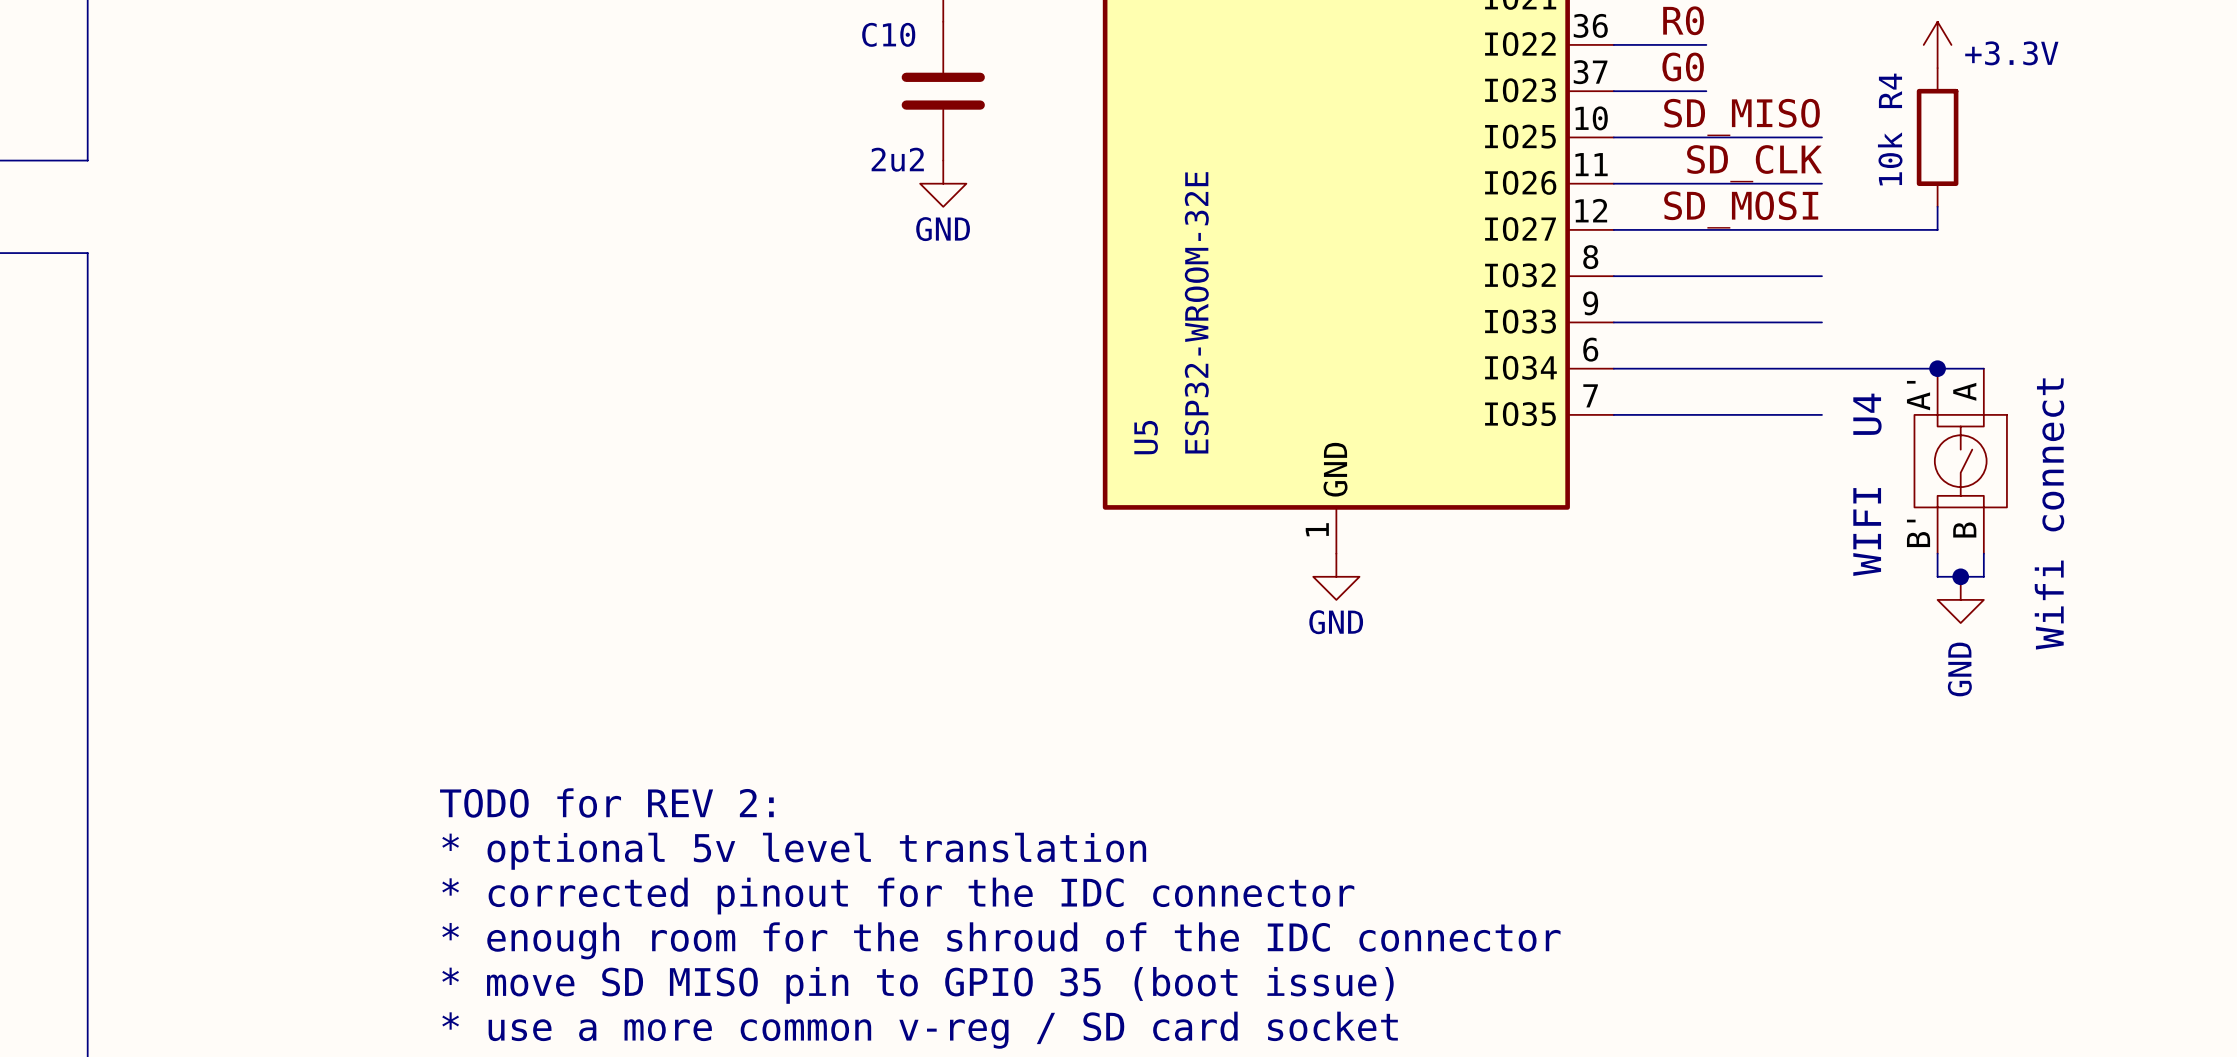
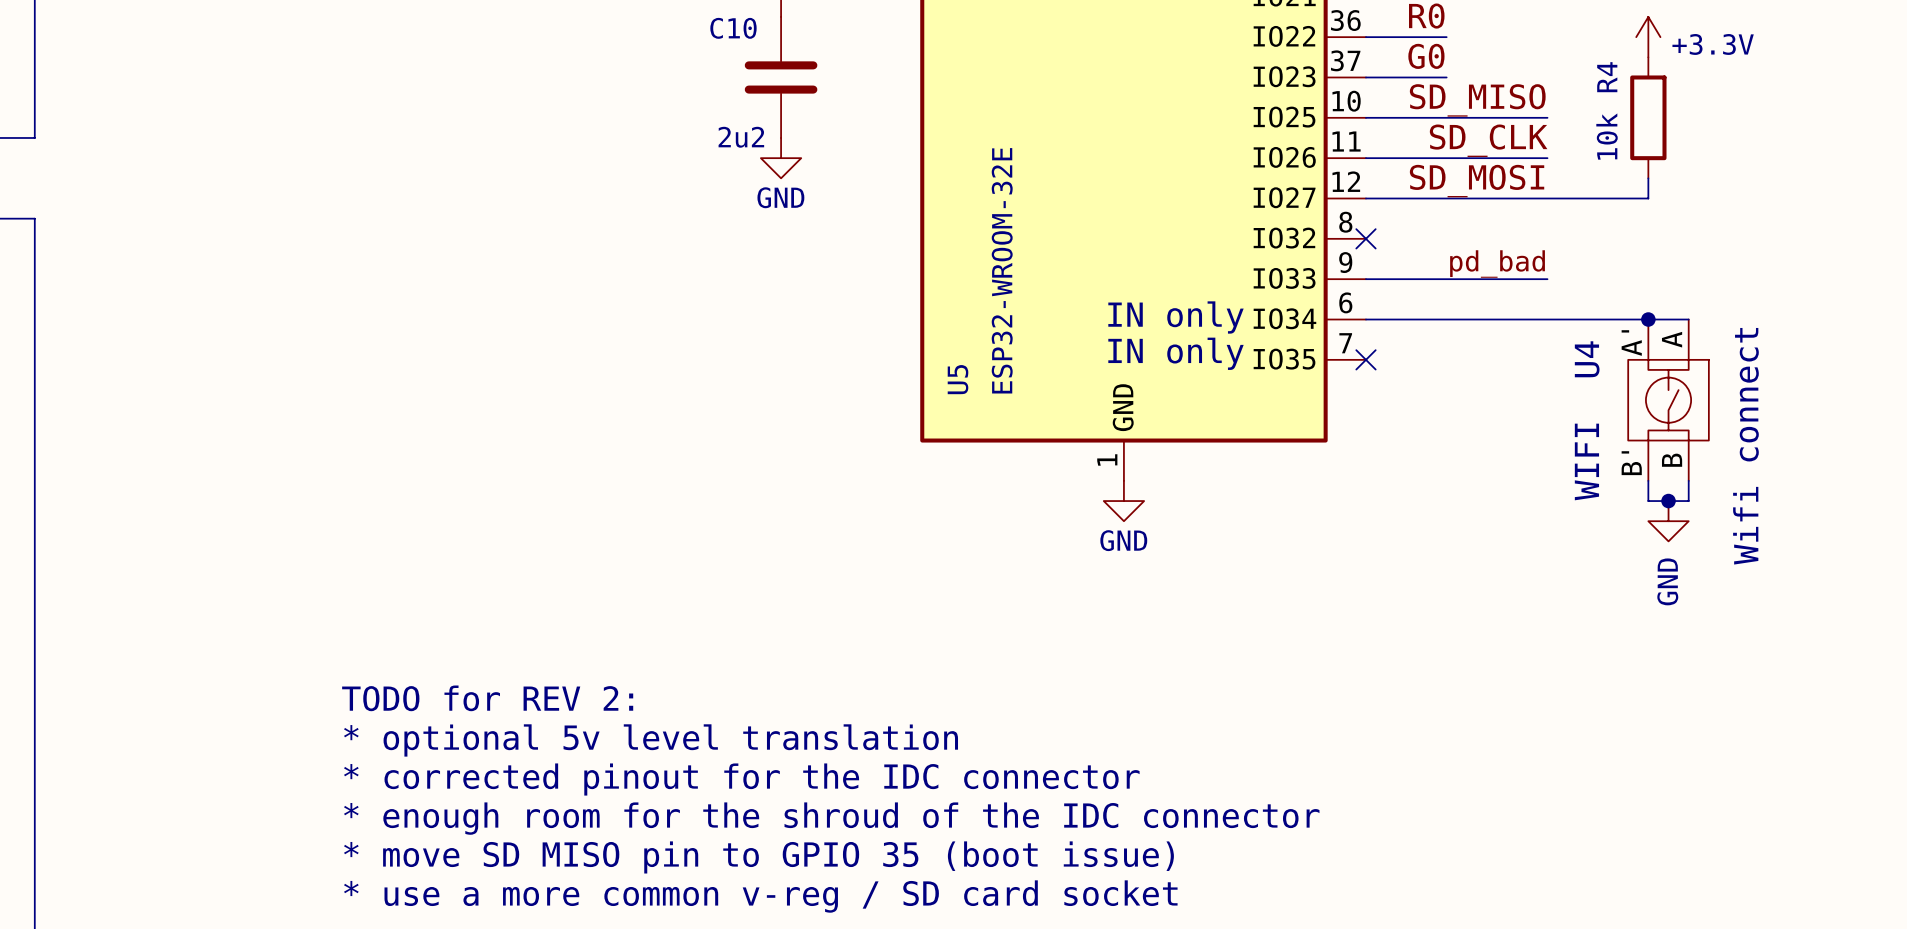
wire: (1613, 276) (1821, 276) -> none
no-connect mark: none -> (1365, 238)
label: none -> pd_bad (1497, 264)
text: none -> IN only (1175, 317)
text: none -> IN only (1175, 353)
wire: (1613, 414) (1821, 414) -> none
no-connect mark: none -> (1365, 359)

